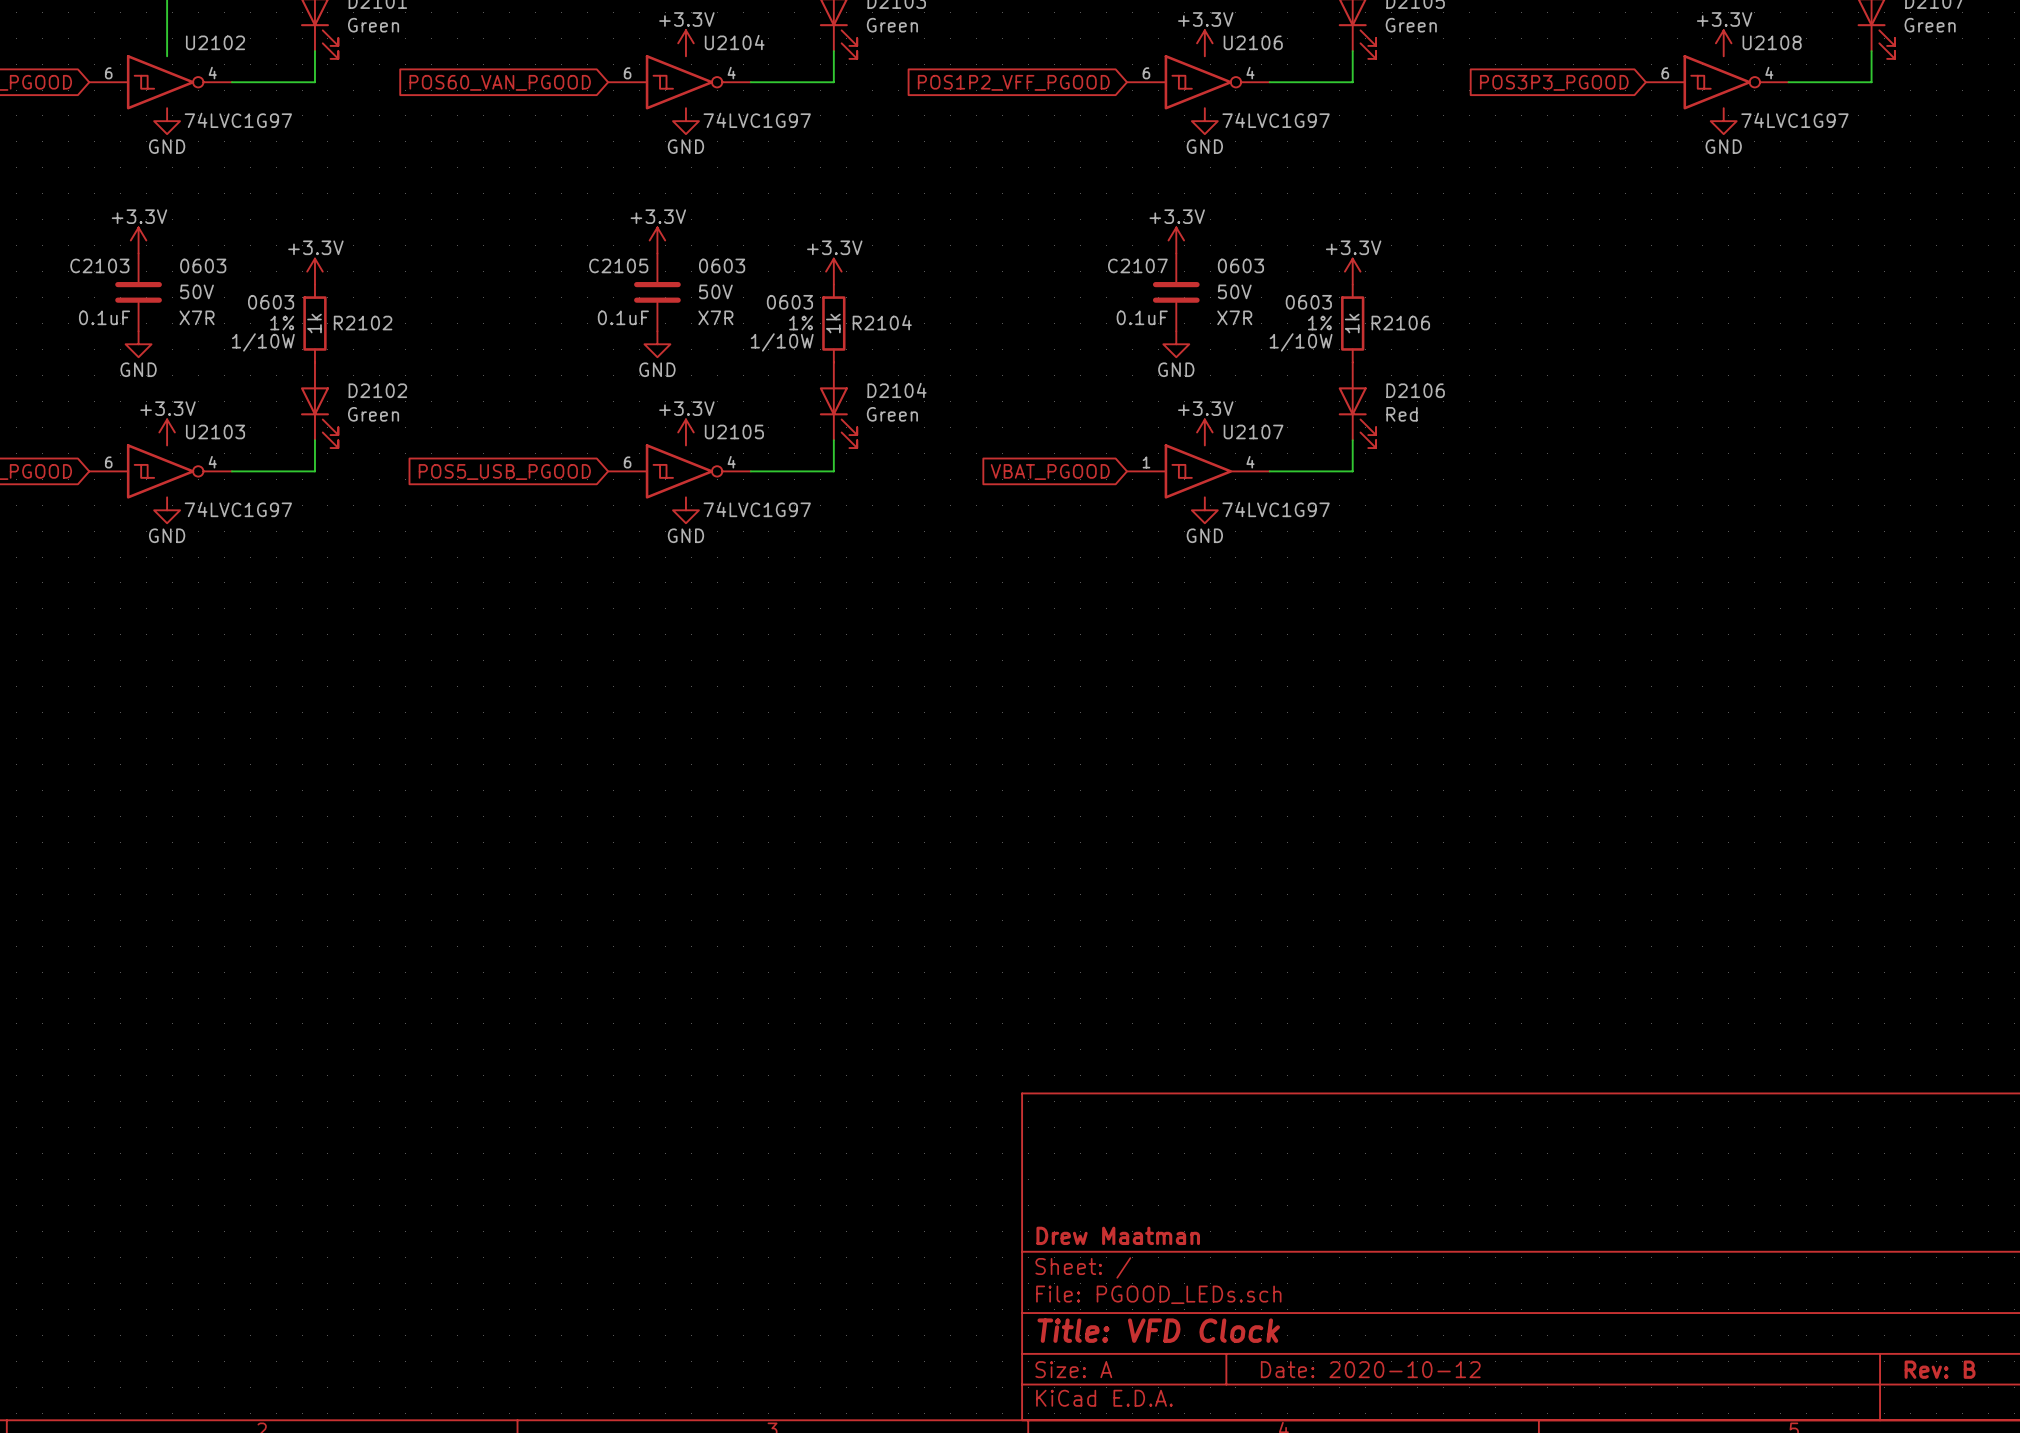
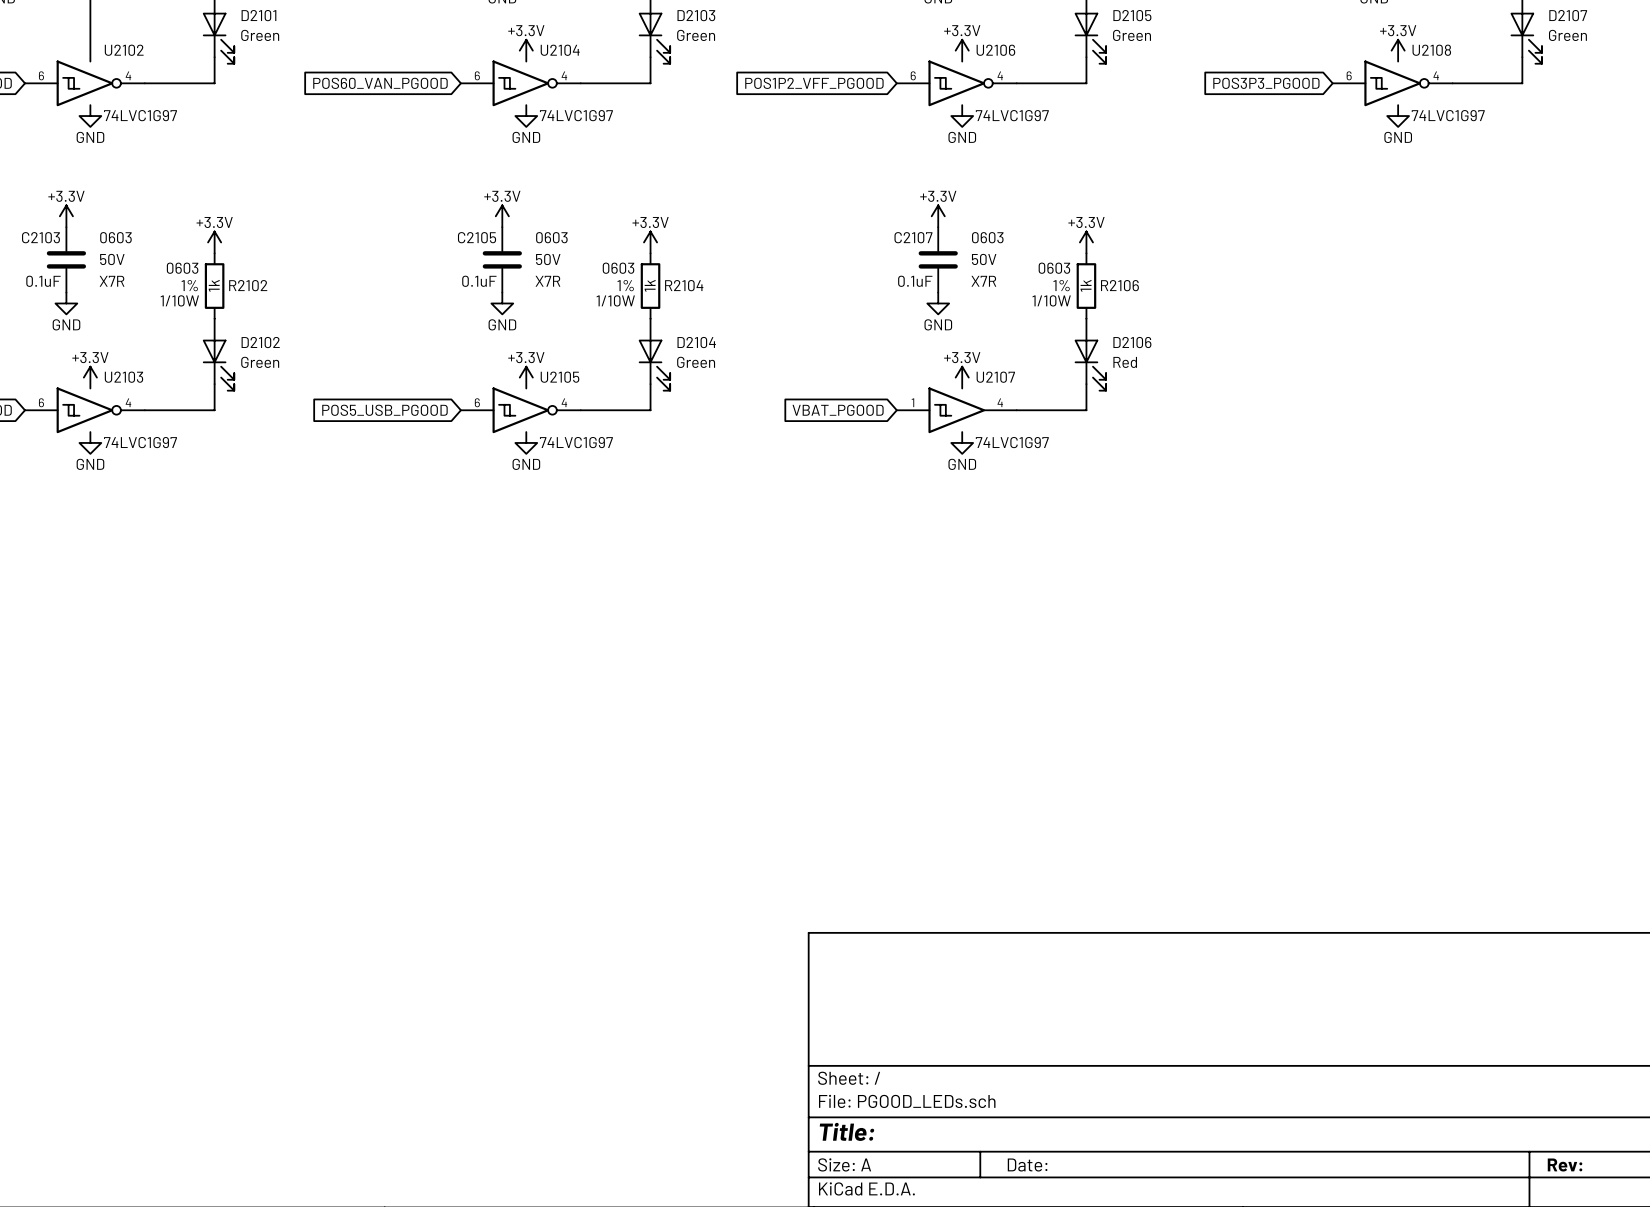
title block: Drew Maatman (1118, 1235) -> none
title block: Title: VFD Clock (1158, 1330) -> Title: (846, 1131)
title block: Date: 2020-10-12 (1370, 1369) -> Date: (1027, 1165)
title block: Rev: B (1940, 1369) -> Rev: (1565, 1165)

